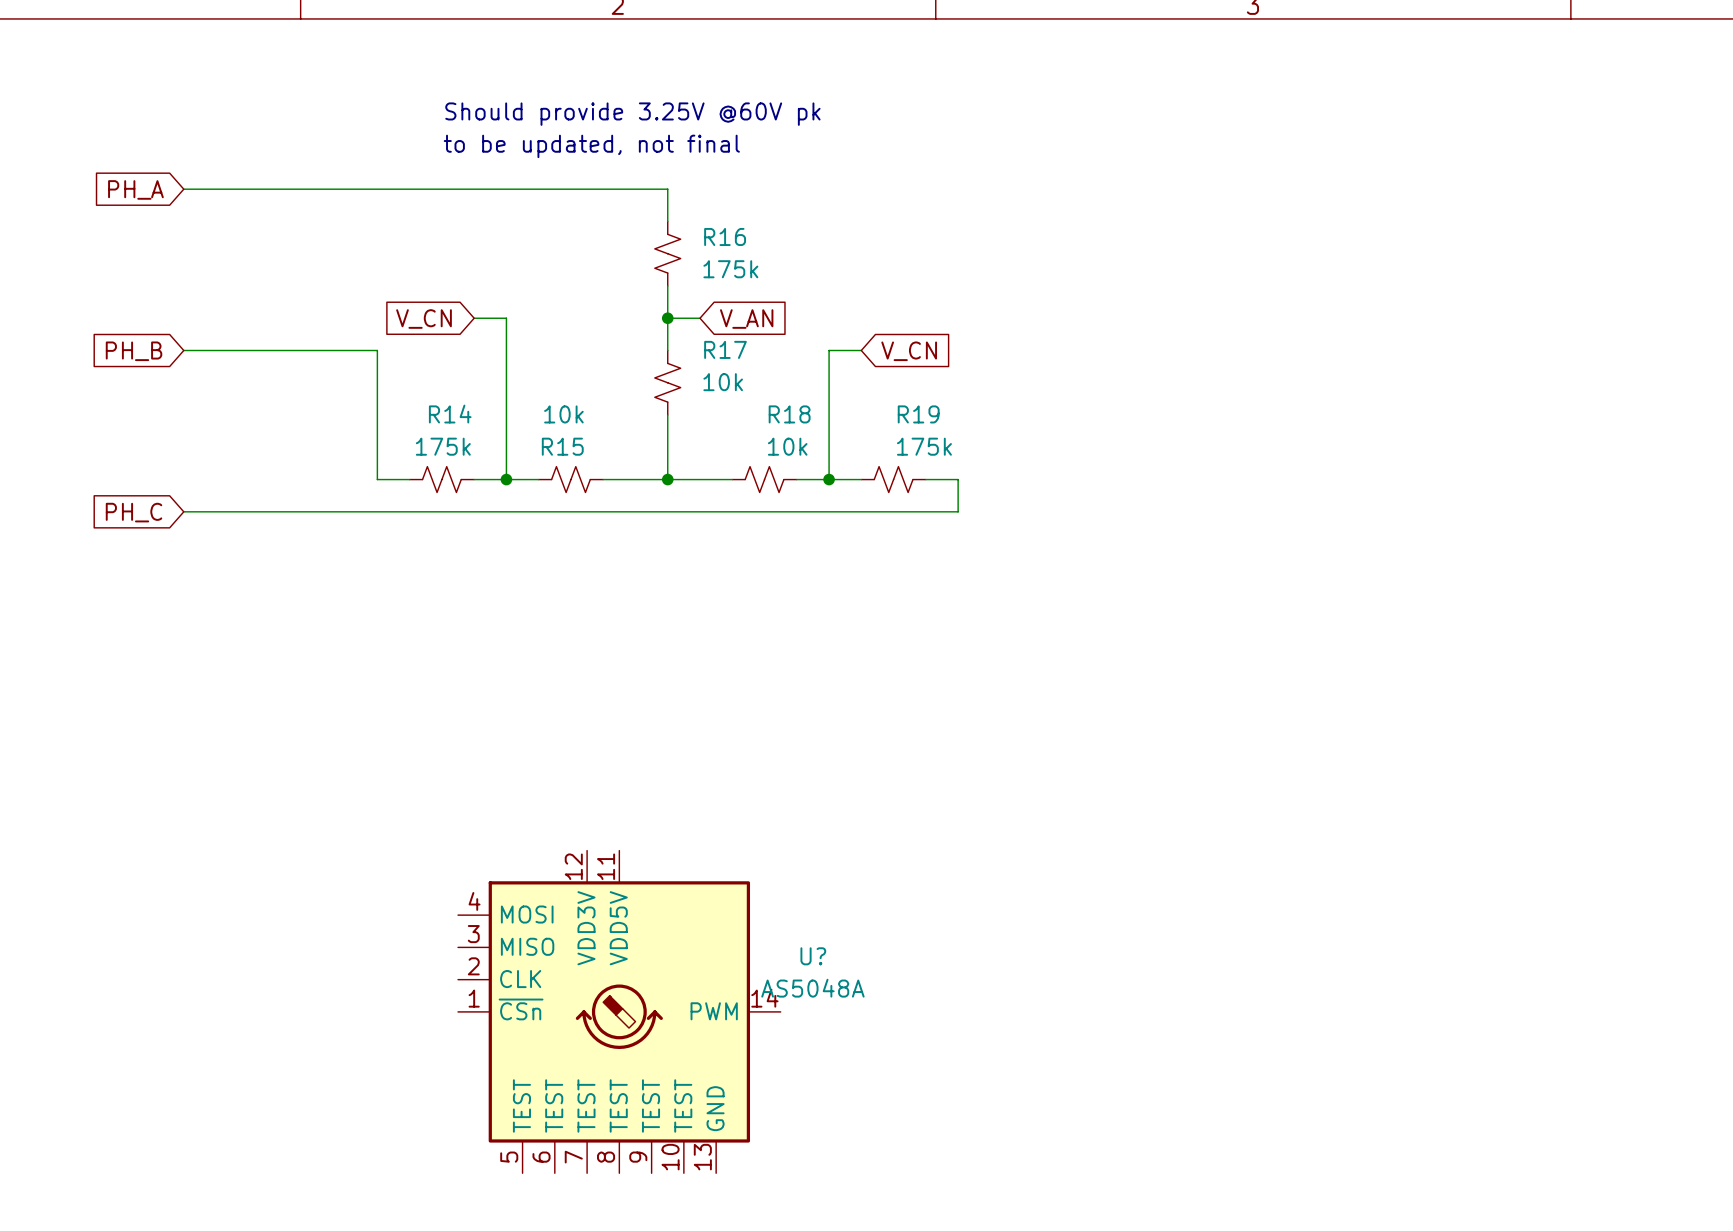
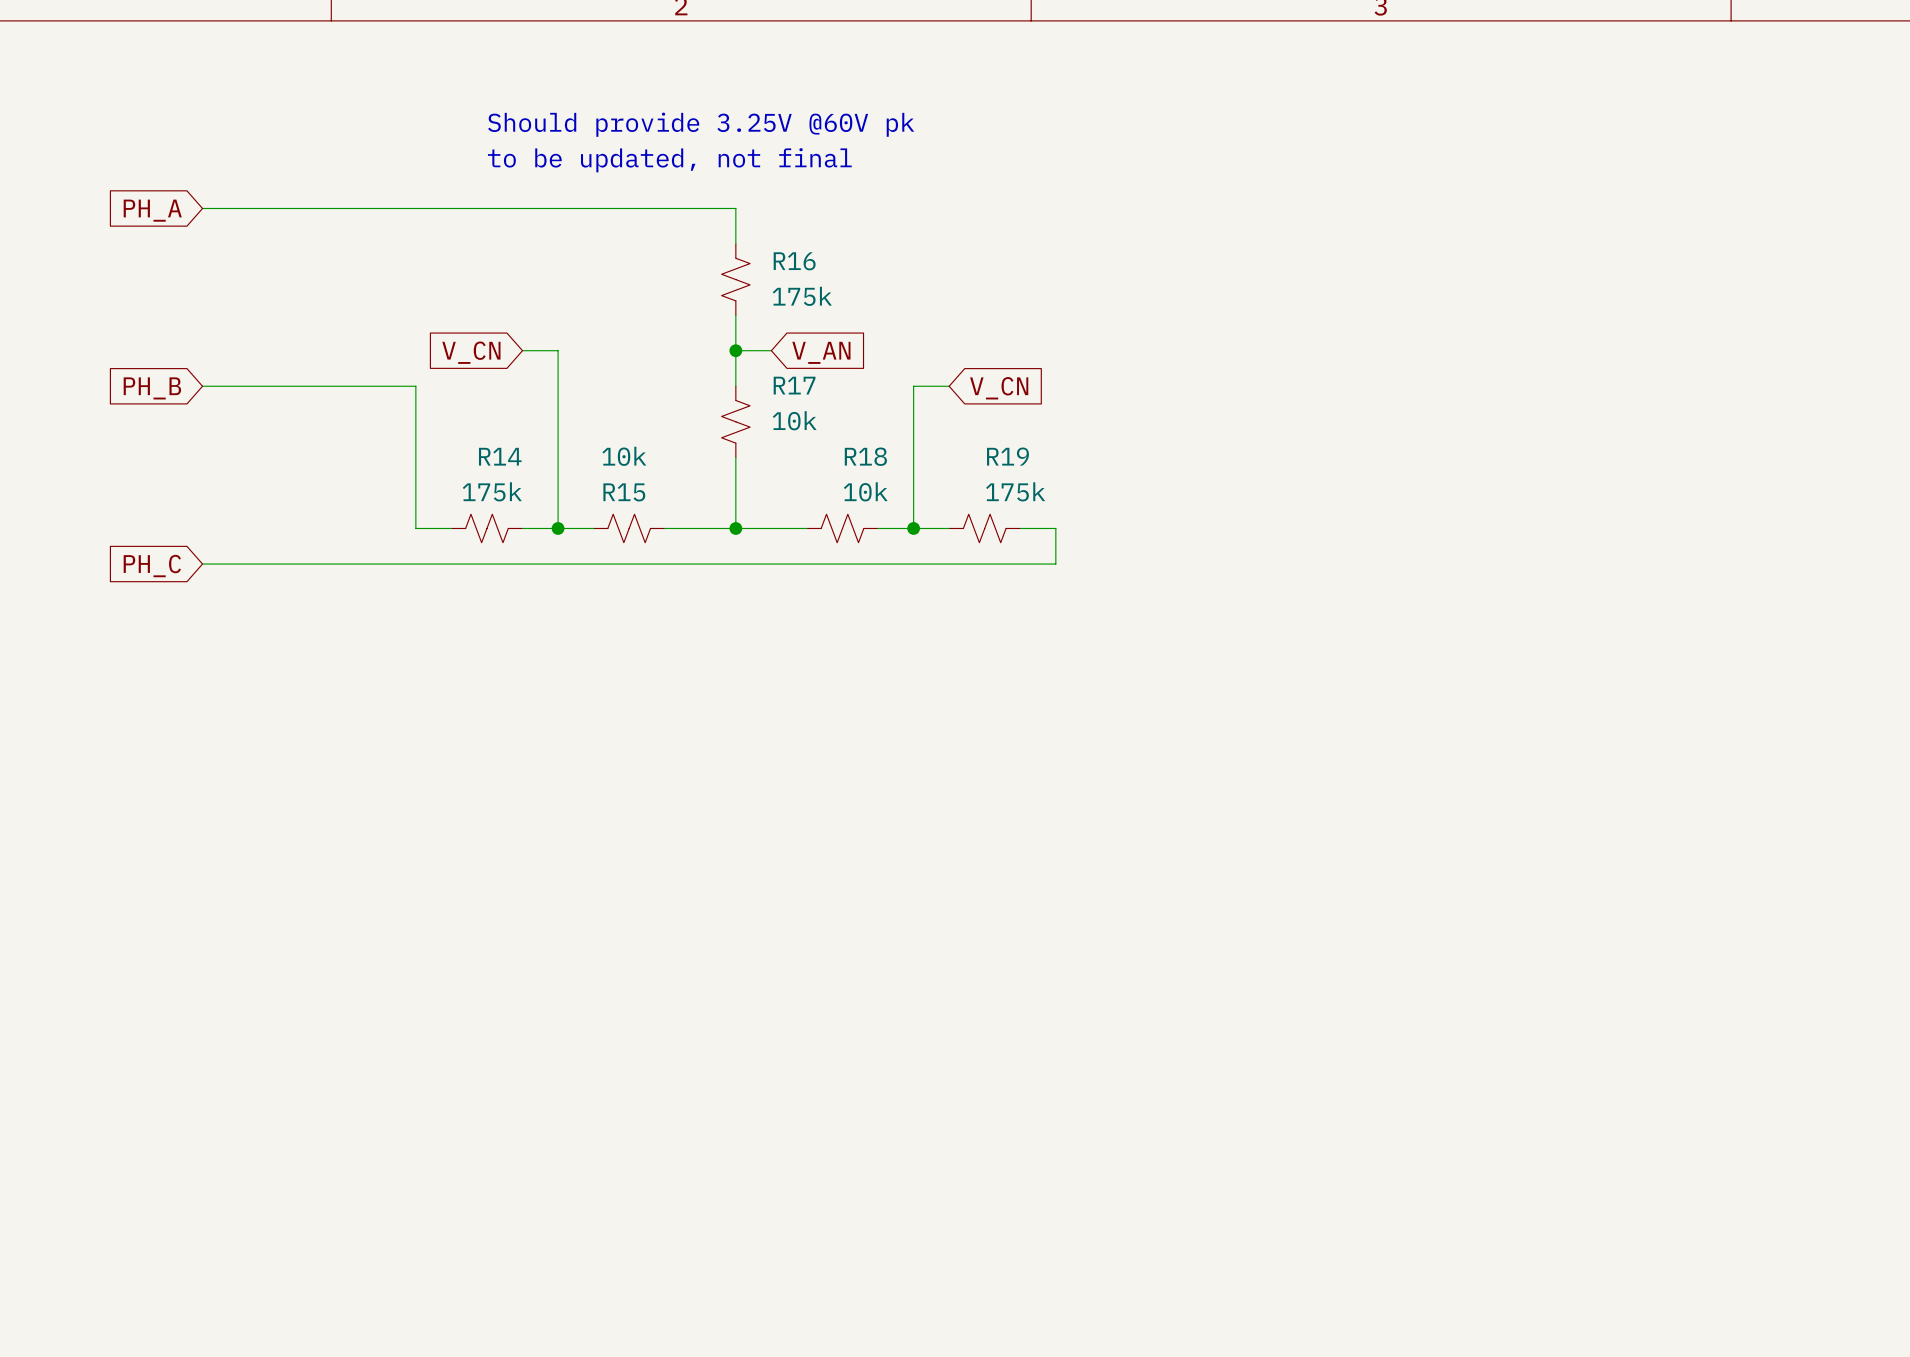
U?: AS5048A (619, 1011) -> none

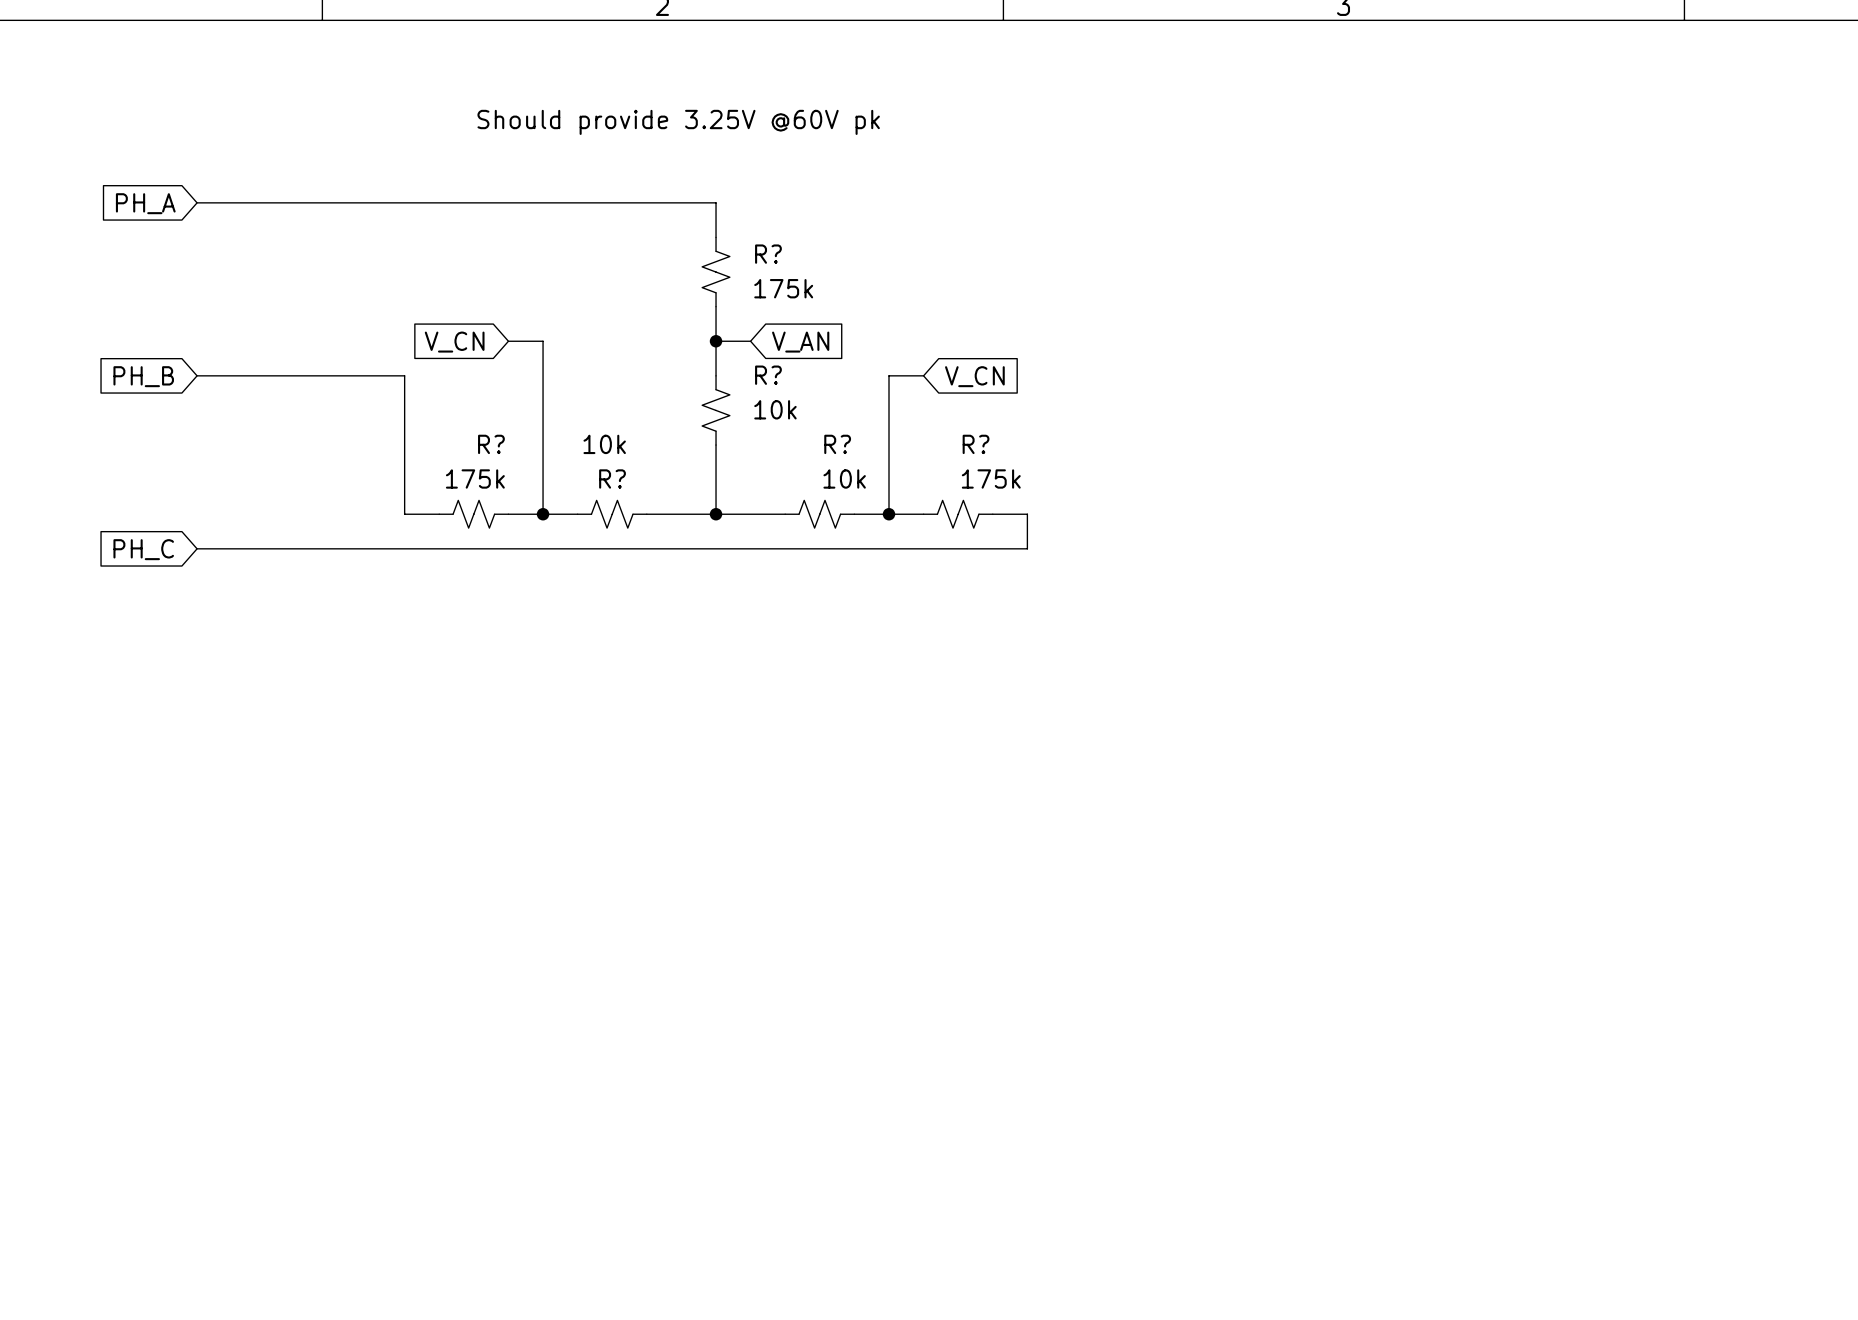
text: to be updated, not final (669, 160) -> none
R16 name: R16 (794, 261) -> R? (768, 254)
R17 name: R17 (794, 385) -> R? (768, 375)
R14 name: R14 (500, 456) -> R? (491, 444)
R18 name: R18 (865, 456) -> R? (837, 444)
R19 name: R19 (1007, 456) -> R? (976, 444)
R15 name: R15 (624, 492) -> R? (612, 478)

